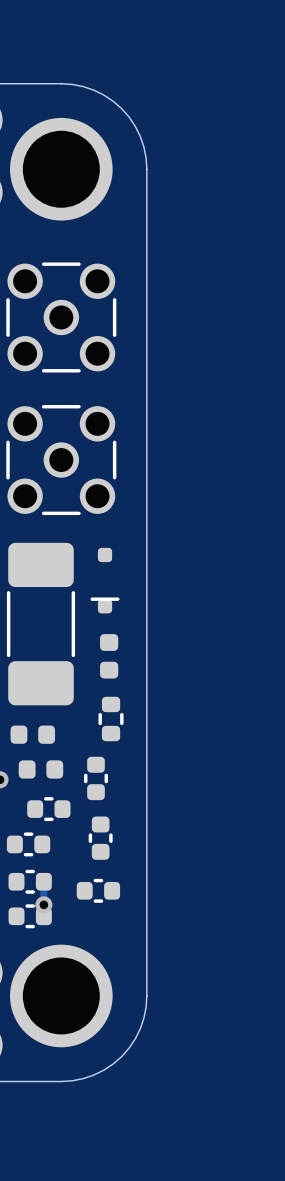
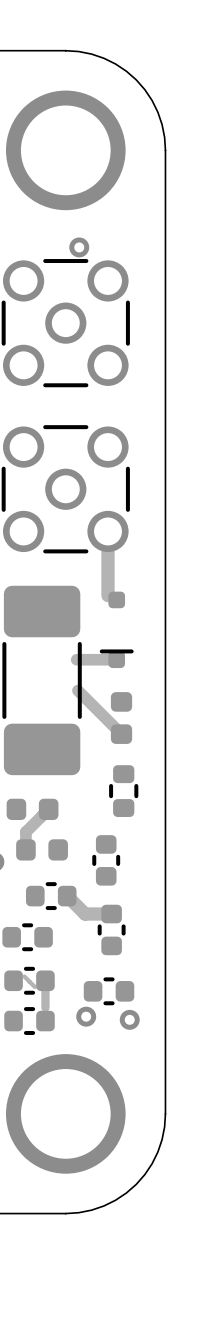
via: none -> (79, 247)
track: none -> (107, 531) (107, 595)
track: none -> (76, 659) (116, 659)
track: none -> (77, 690) (121, 734)
track: none -> (48, 809) (25, 832) (25, 849)
track: none -> (67, 896) (85, 914) (111, 914)
track: none -> (24, 976) (34, 986)
via position: (43, 904) -> (86, 1016)
via: none -> (129, 1019)

